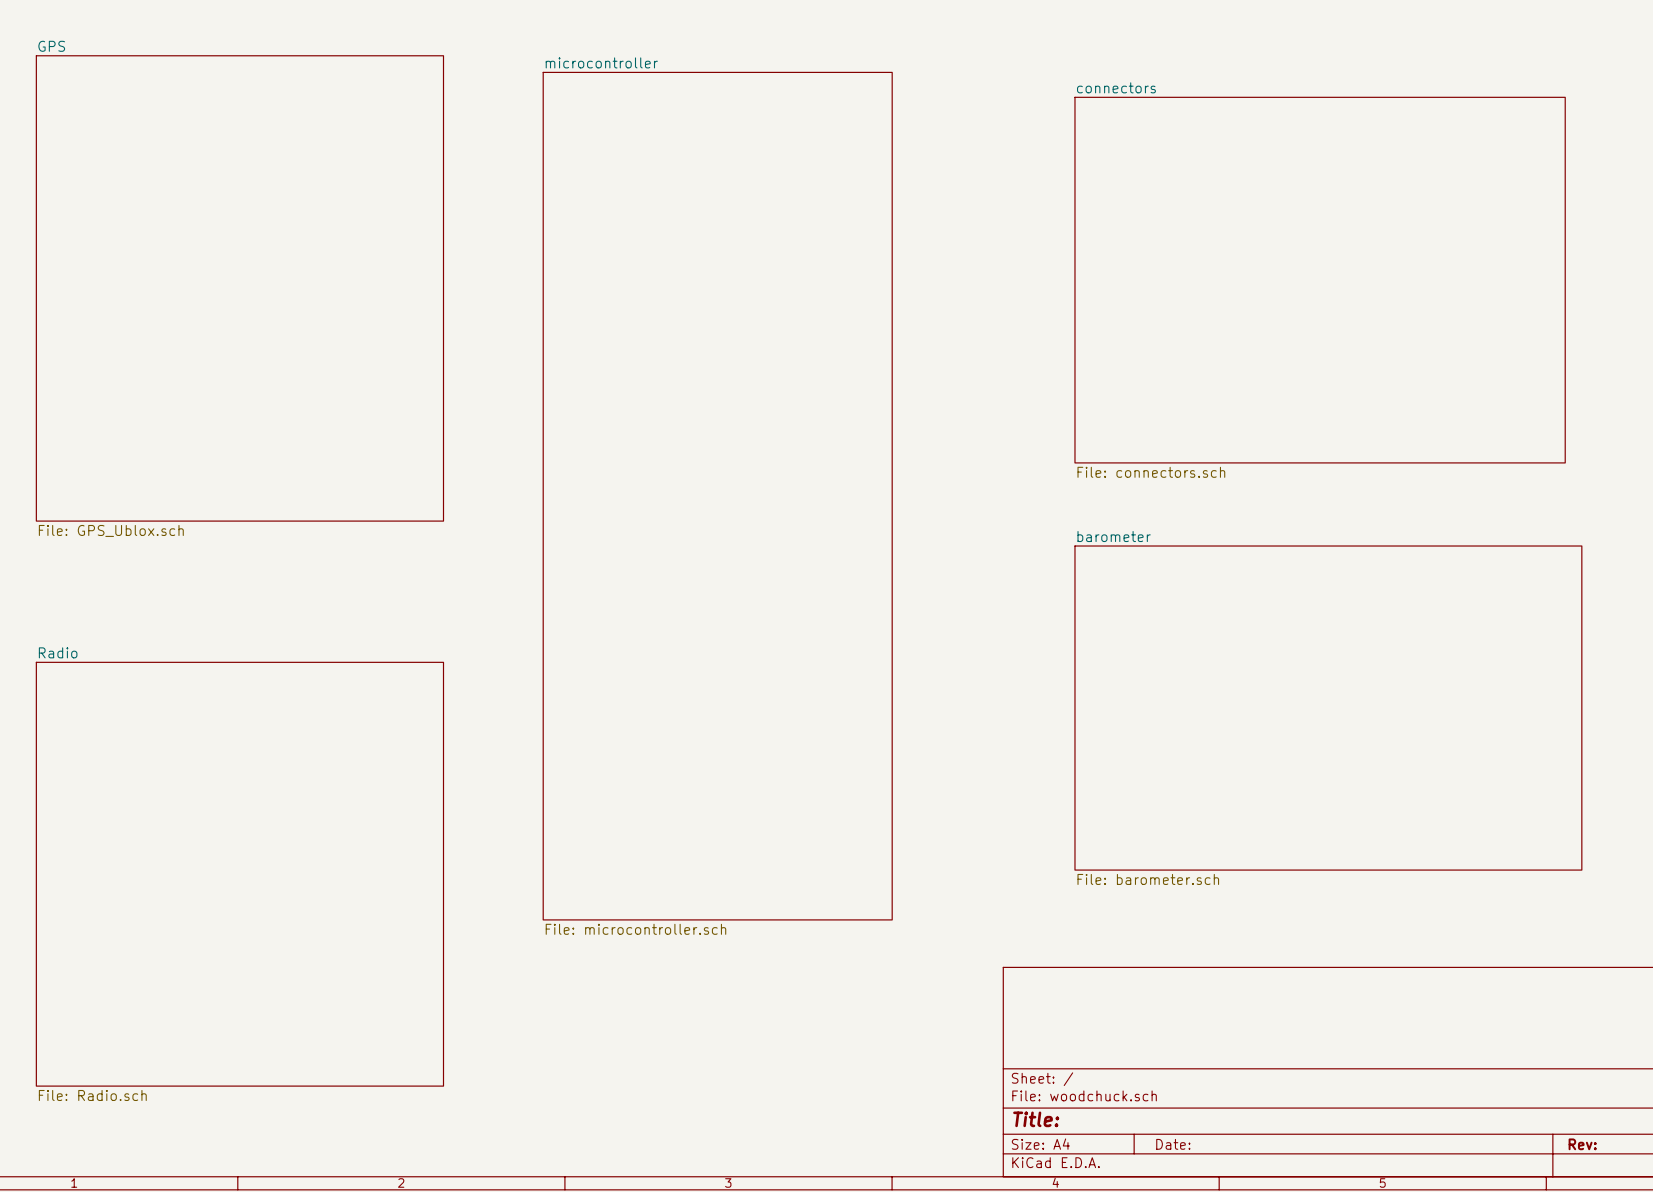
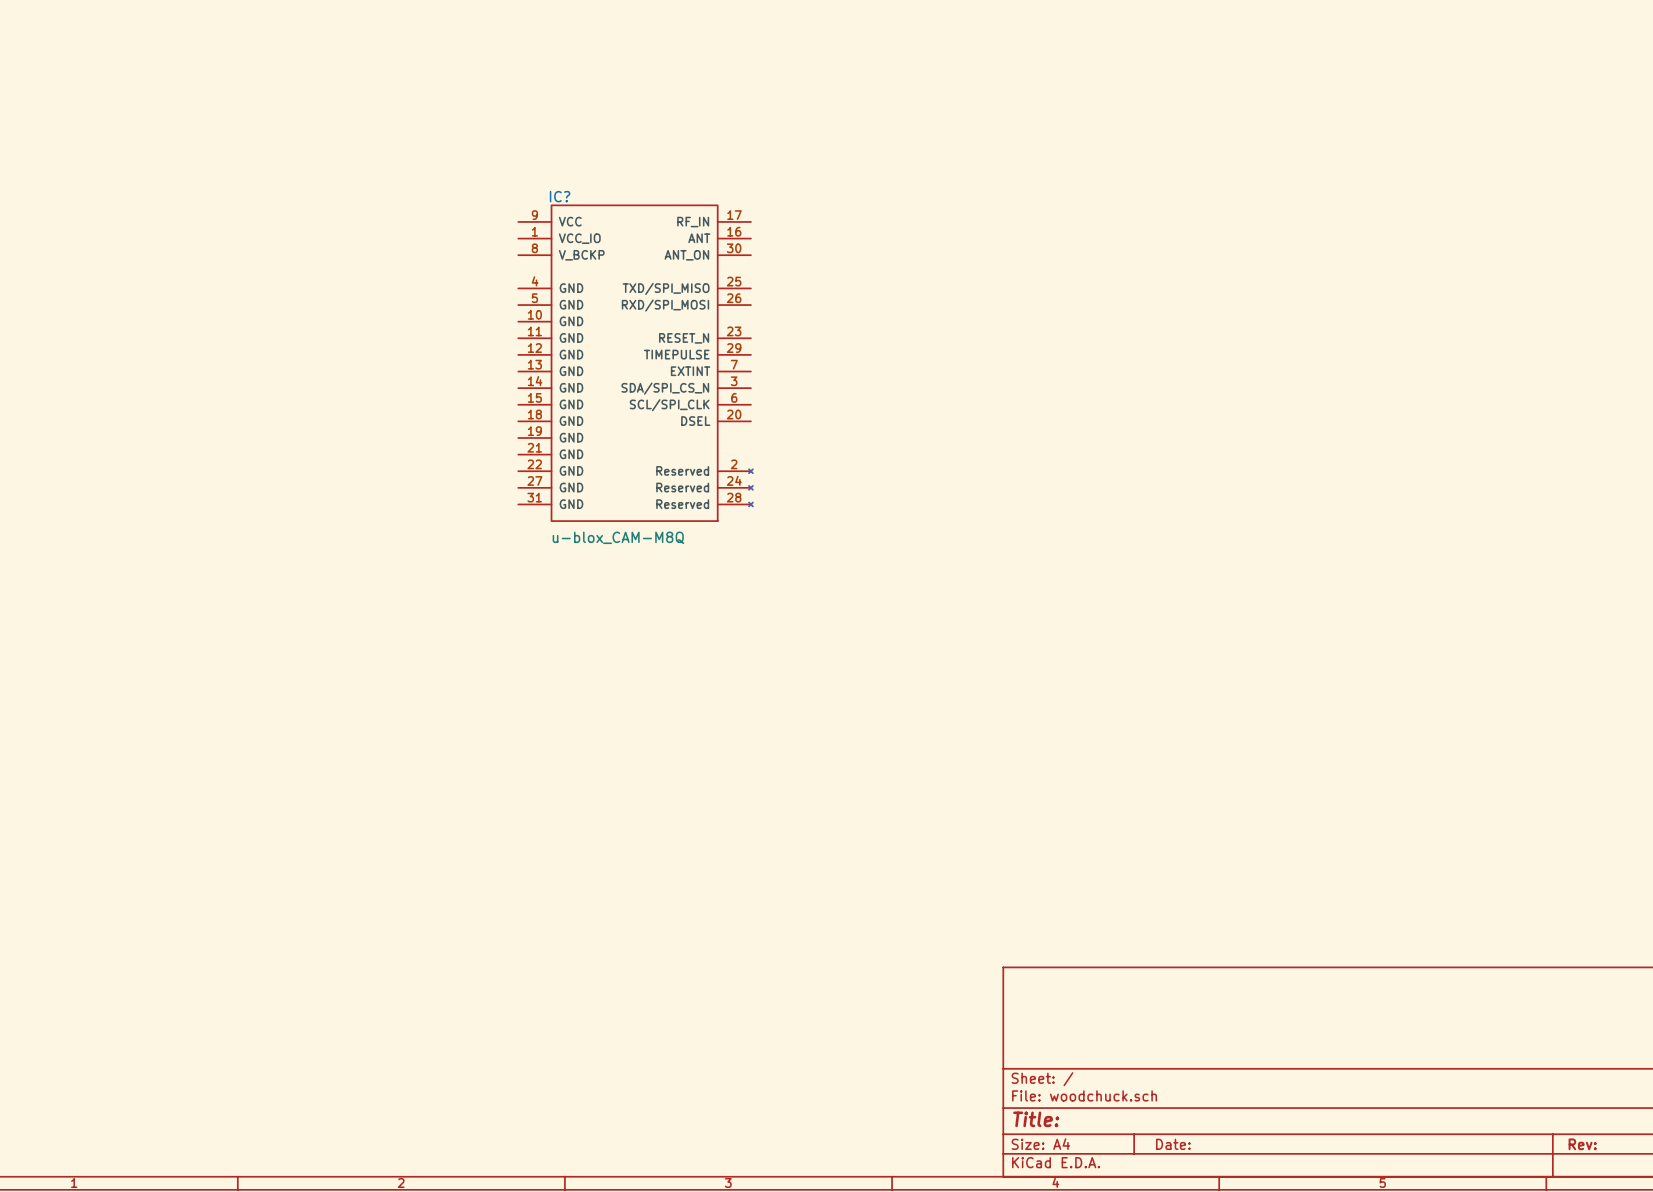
sheet connectors: File: connectors.sch (1320, 280) -> none
sheet GPS: File: GPS_Ublox.sch (239, 288) -> none
IC?: none -> u-blox_CAM-M8Q (635, 363)
sheet microcontroller: File: microcontroller.sch (717, 496) -> none
sheet barometer: File: barometer.sch (1328, 708) -> none
sheet Radio: File: Radio.sch (239, 874) -> none

